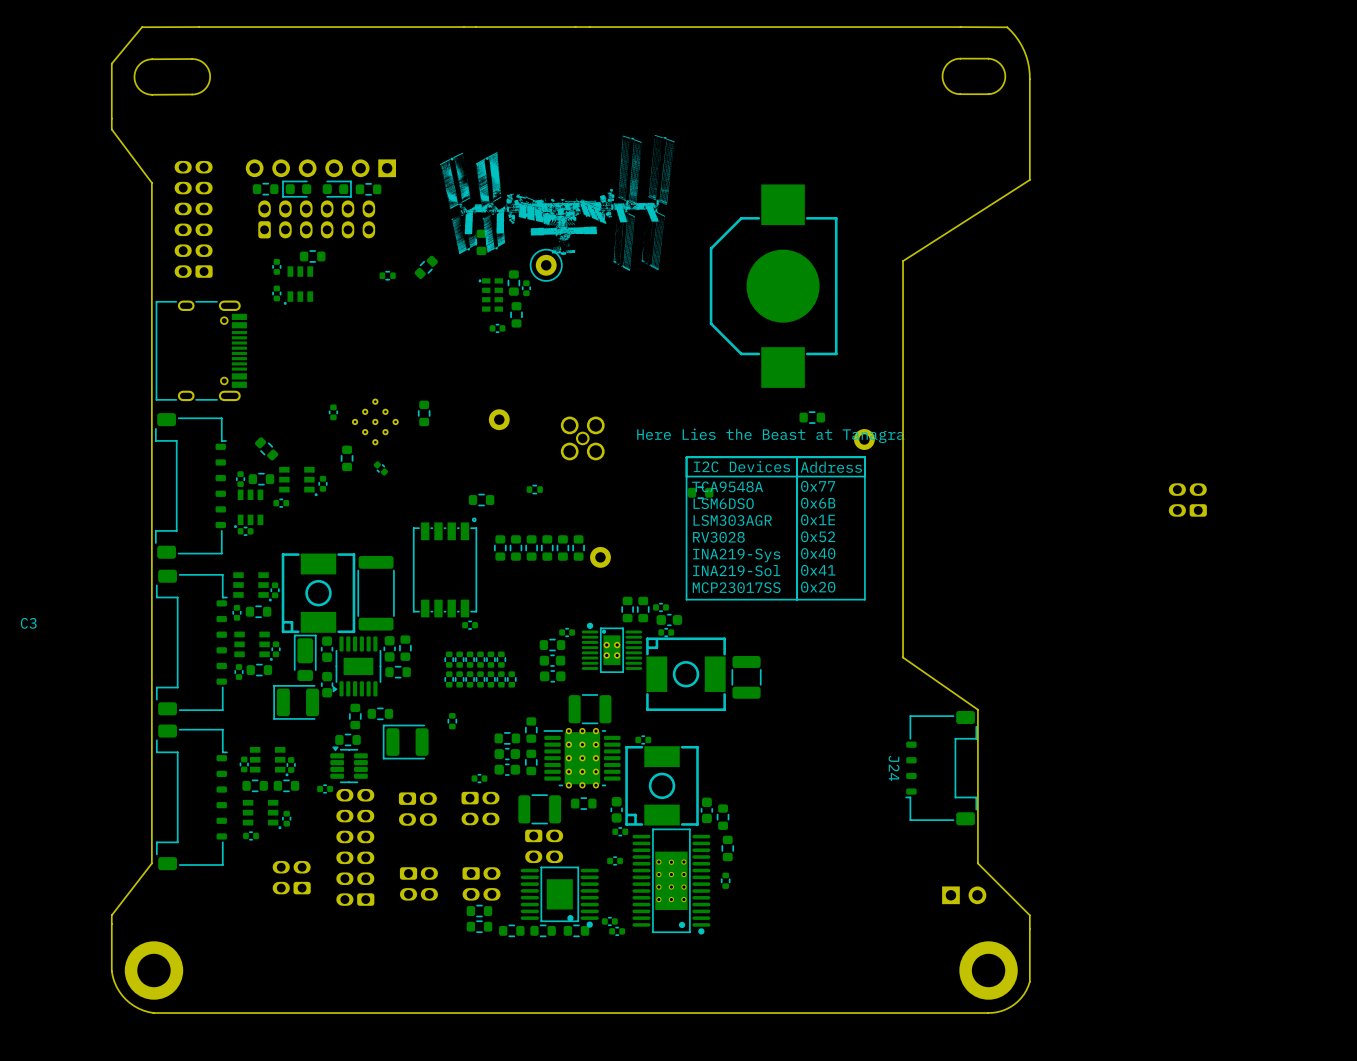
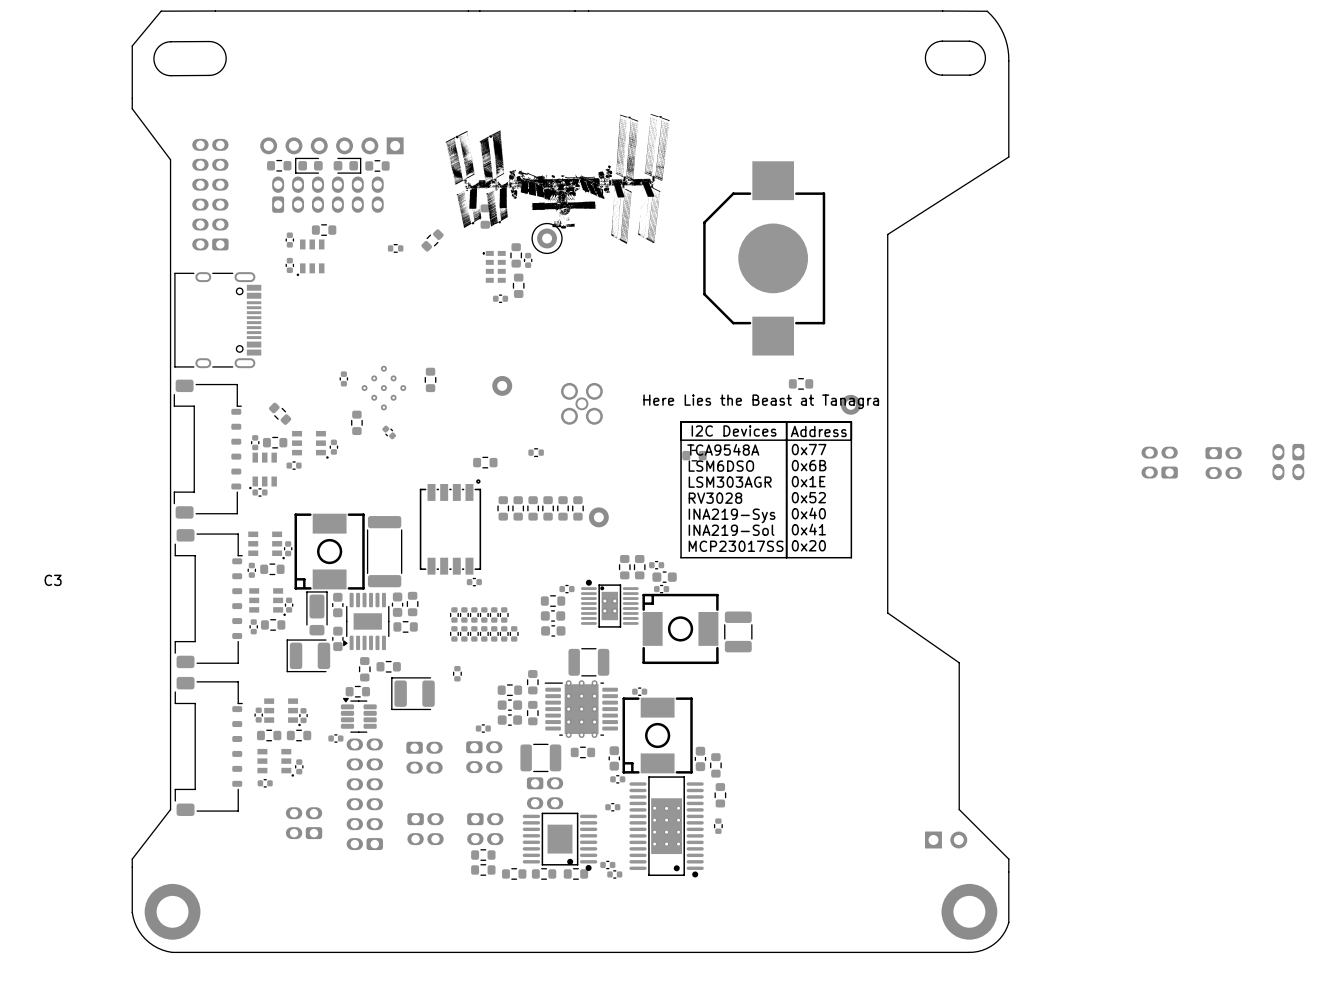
part: none -> (1288, 462)
part: none -> (1223, 463)
J24: (941, 768) -> none

